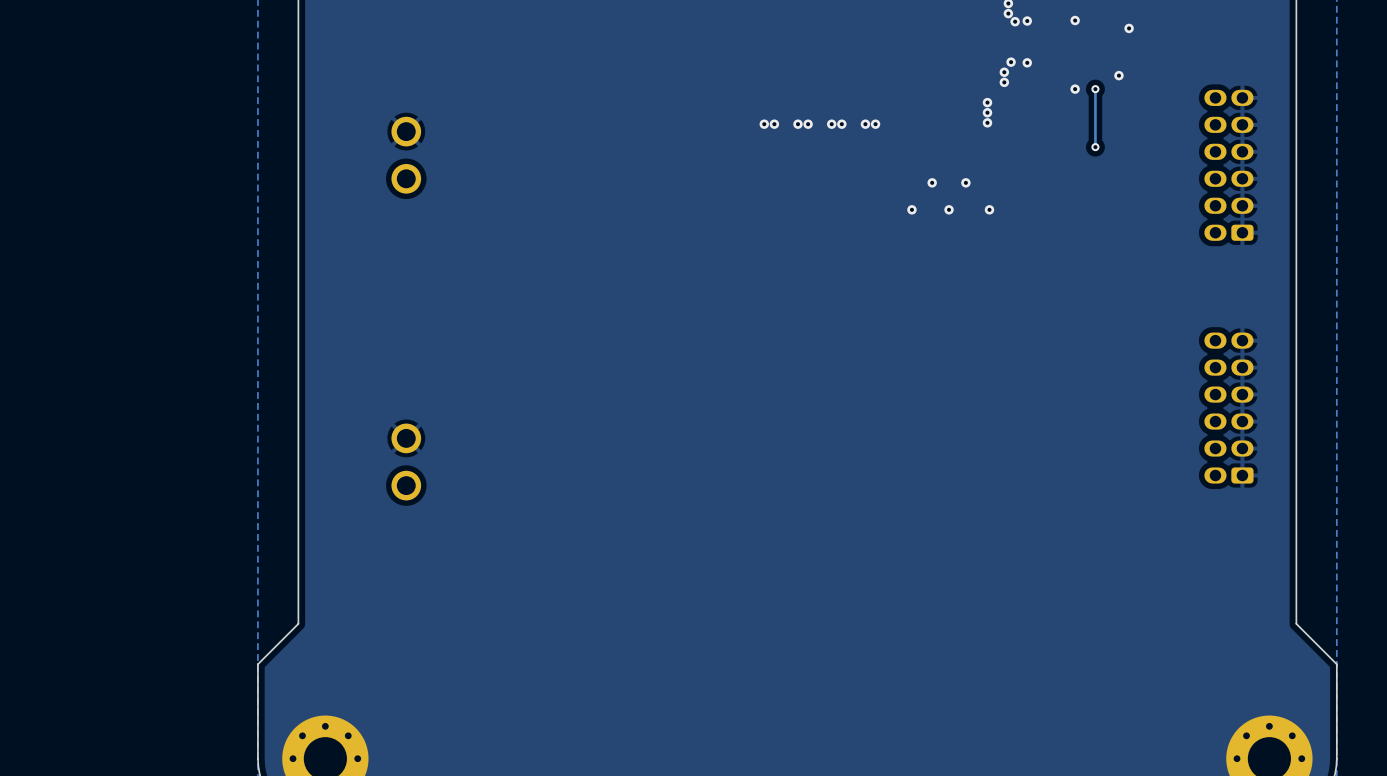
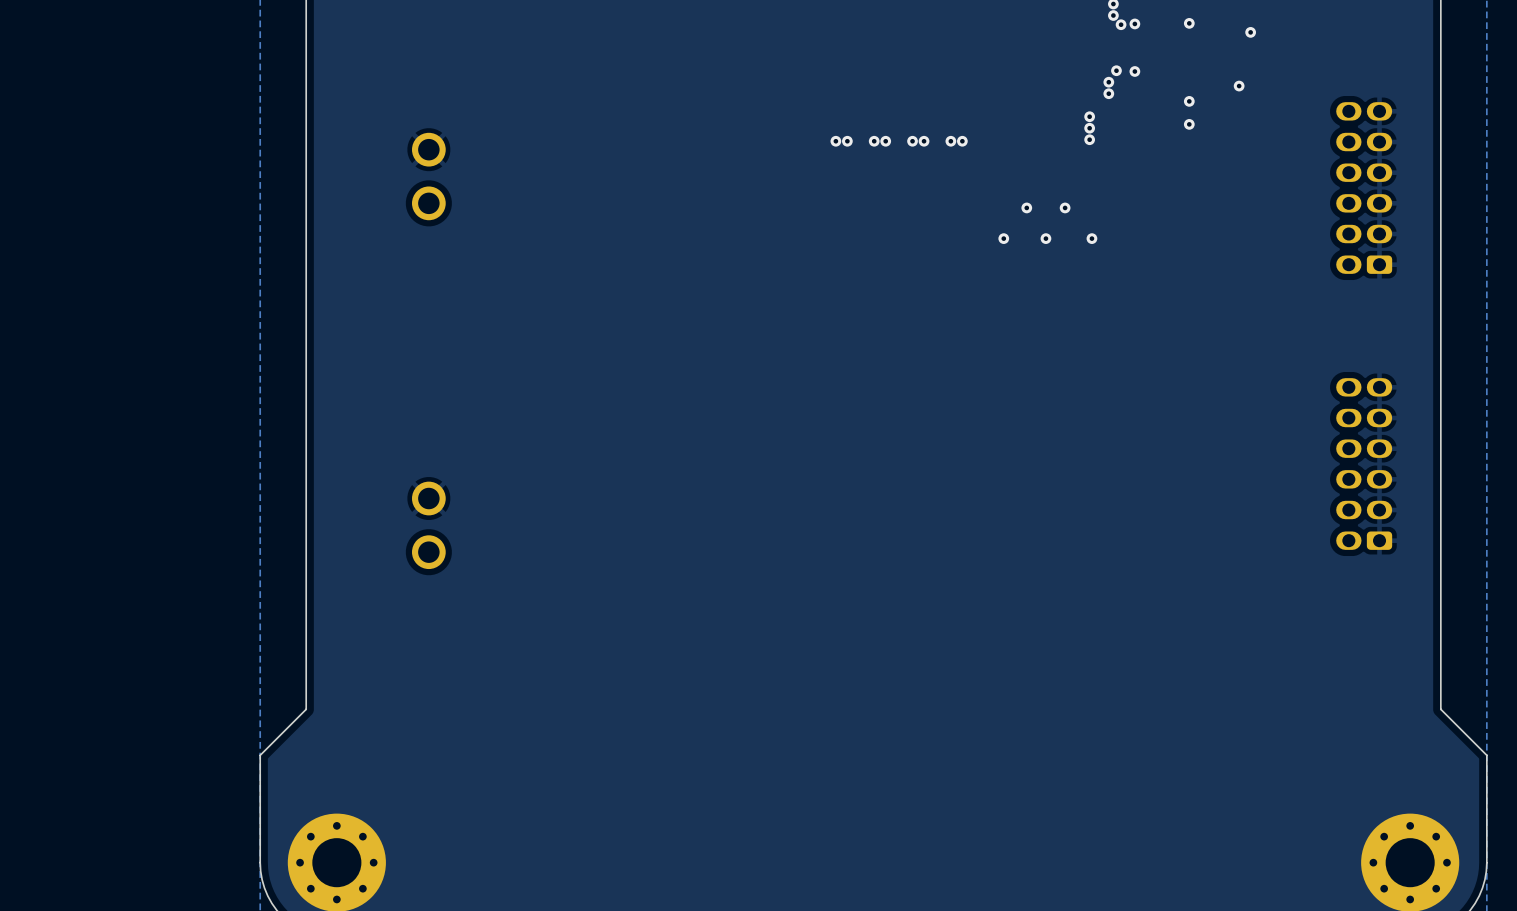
track: (1095, 89) (1095, 147) -> none
via: (1095, 89) -> none
via: none -> (1189, 124)
via: (1095, 147) -> none

